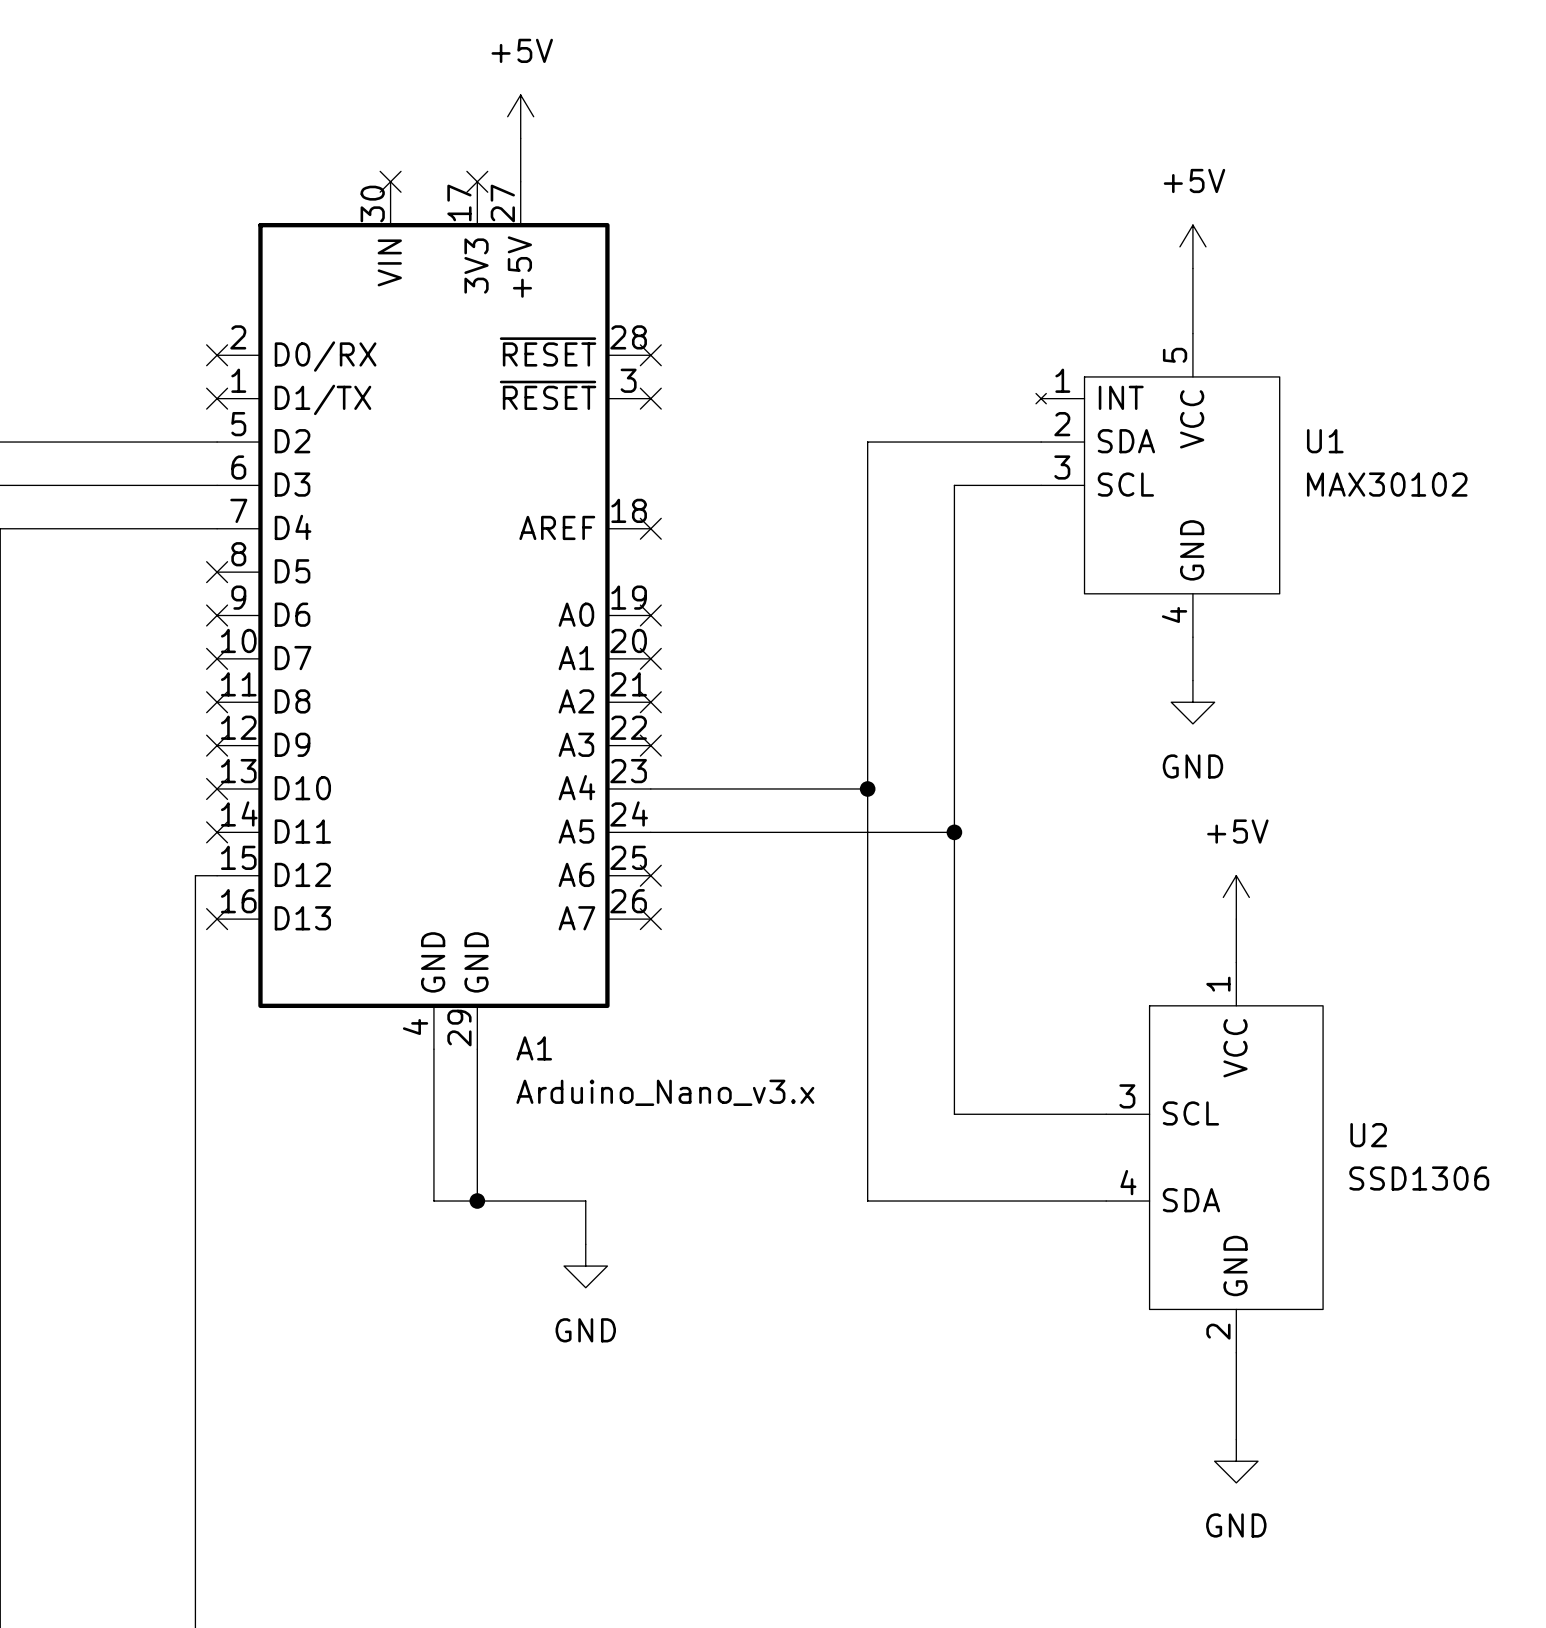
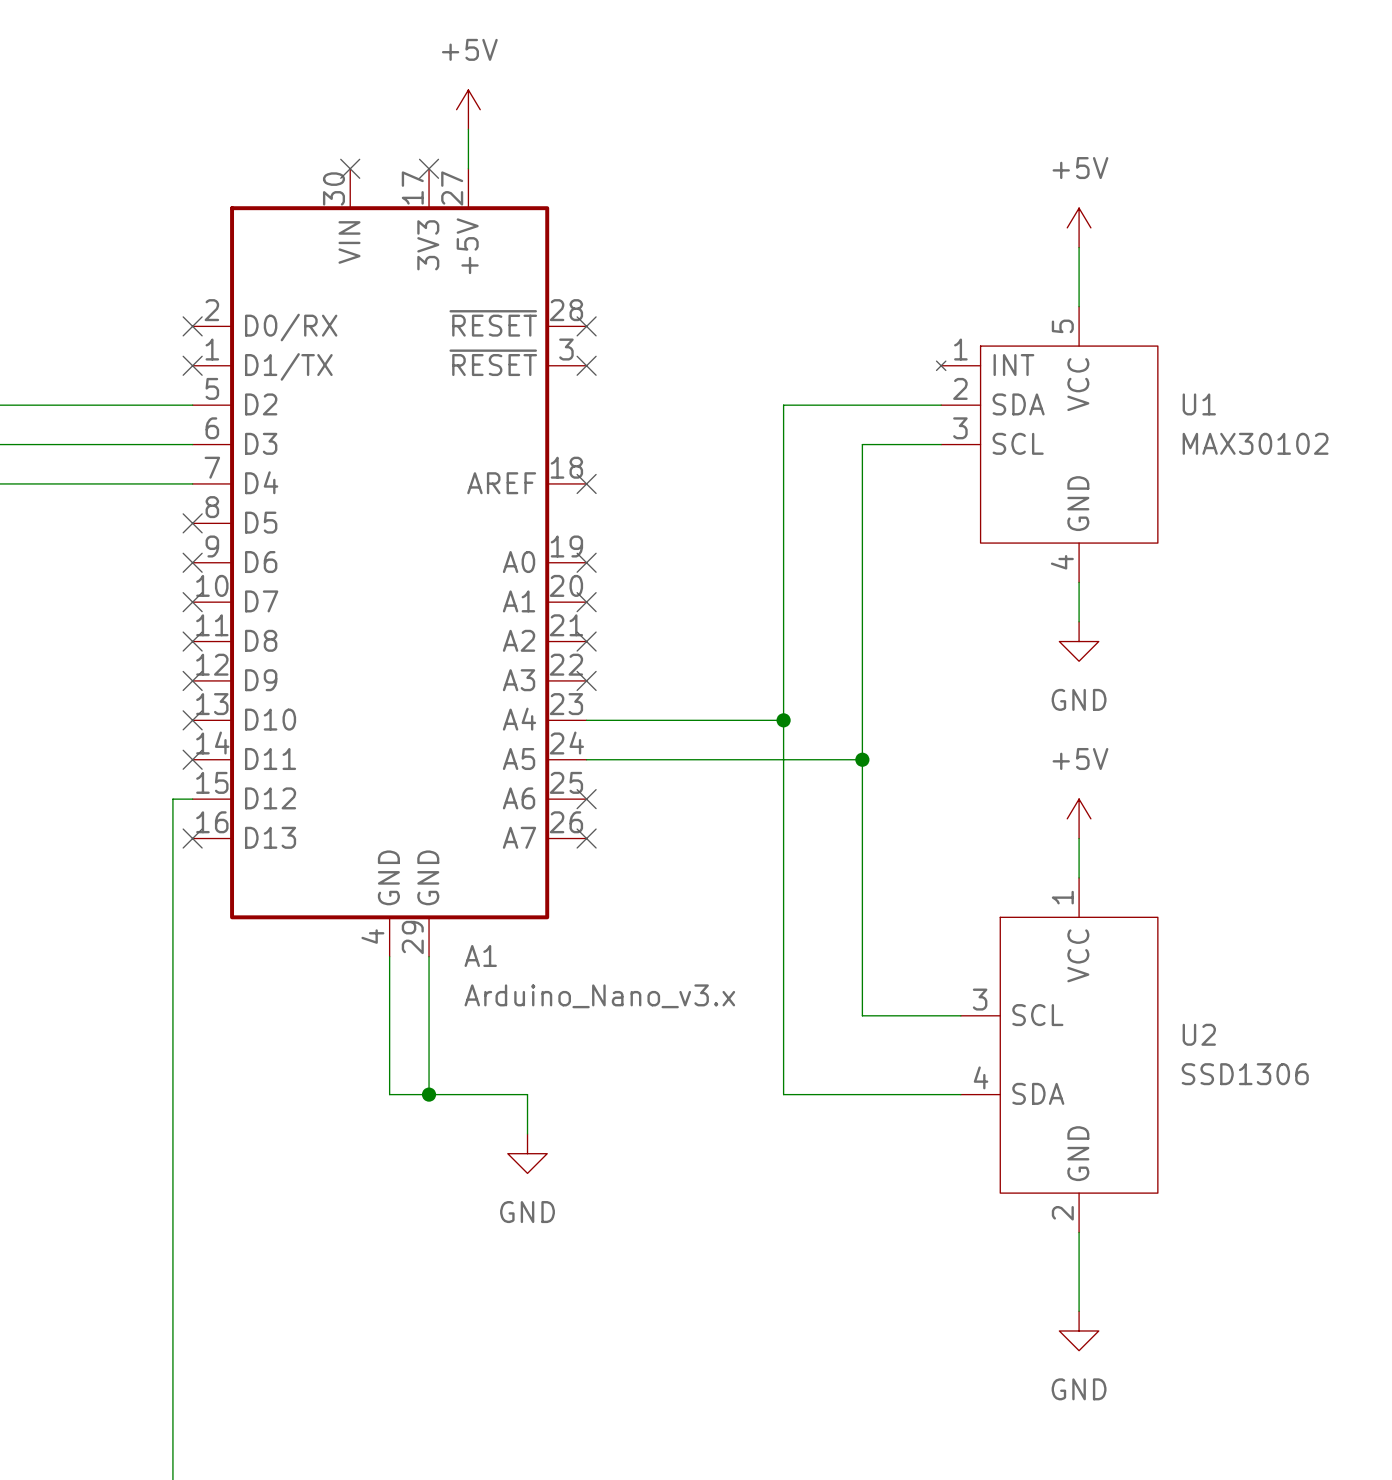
power symbol position: +5V (1236, 897) -> +5V (1079, 818)
wire: (1236, 919) (1236, 962) -> (1079, 838) (1079, 877)
U2 position: (1214, 1157) -> (1059, 1055)
wire: (1236, 1352) (1236, 1439) -> (1079, 1232) (1079, 1311)
power symbol position: GND (1236, 1461) -> GND (1079, 1330)

